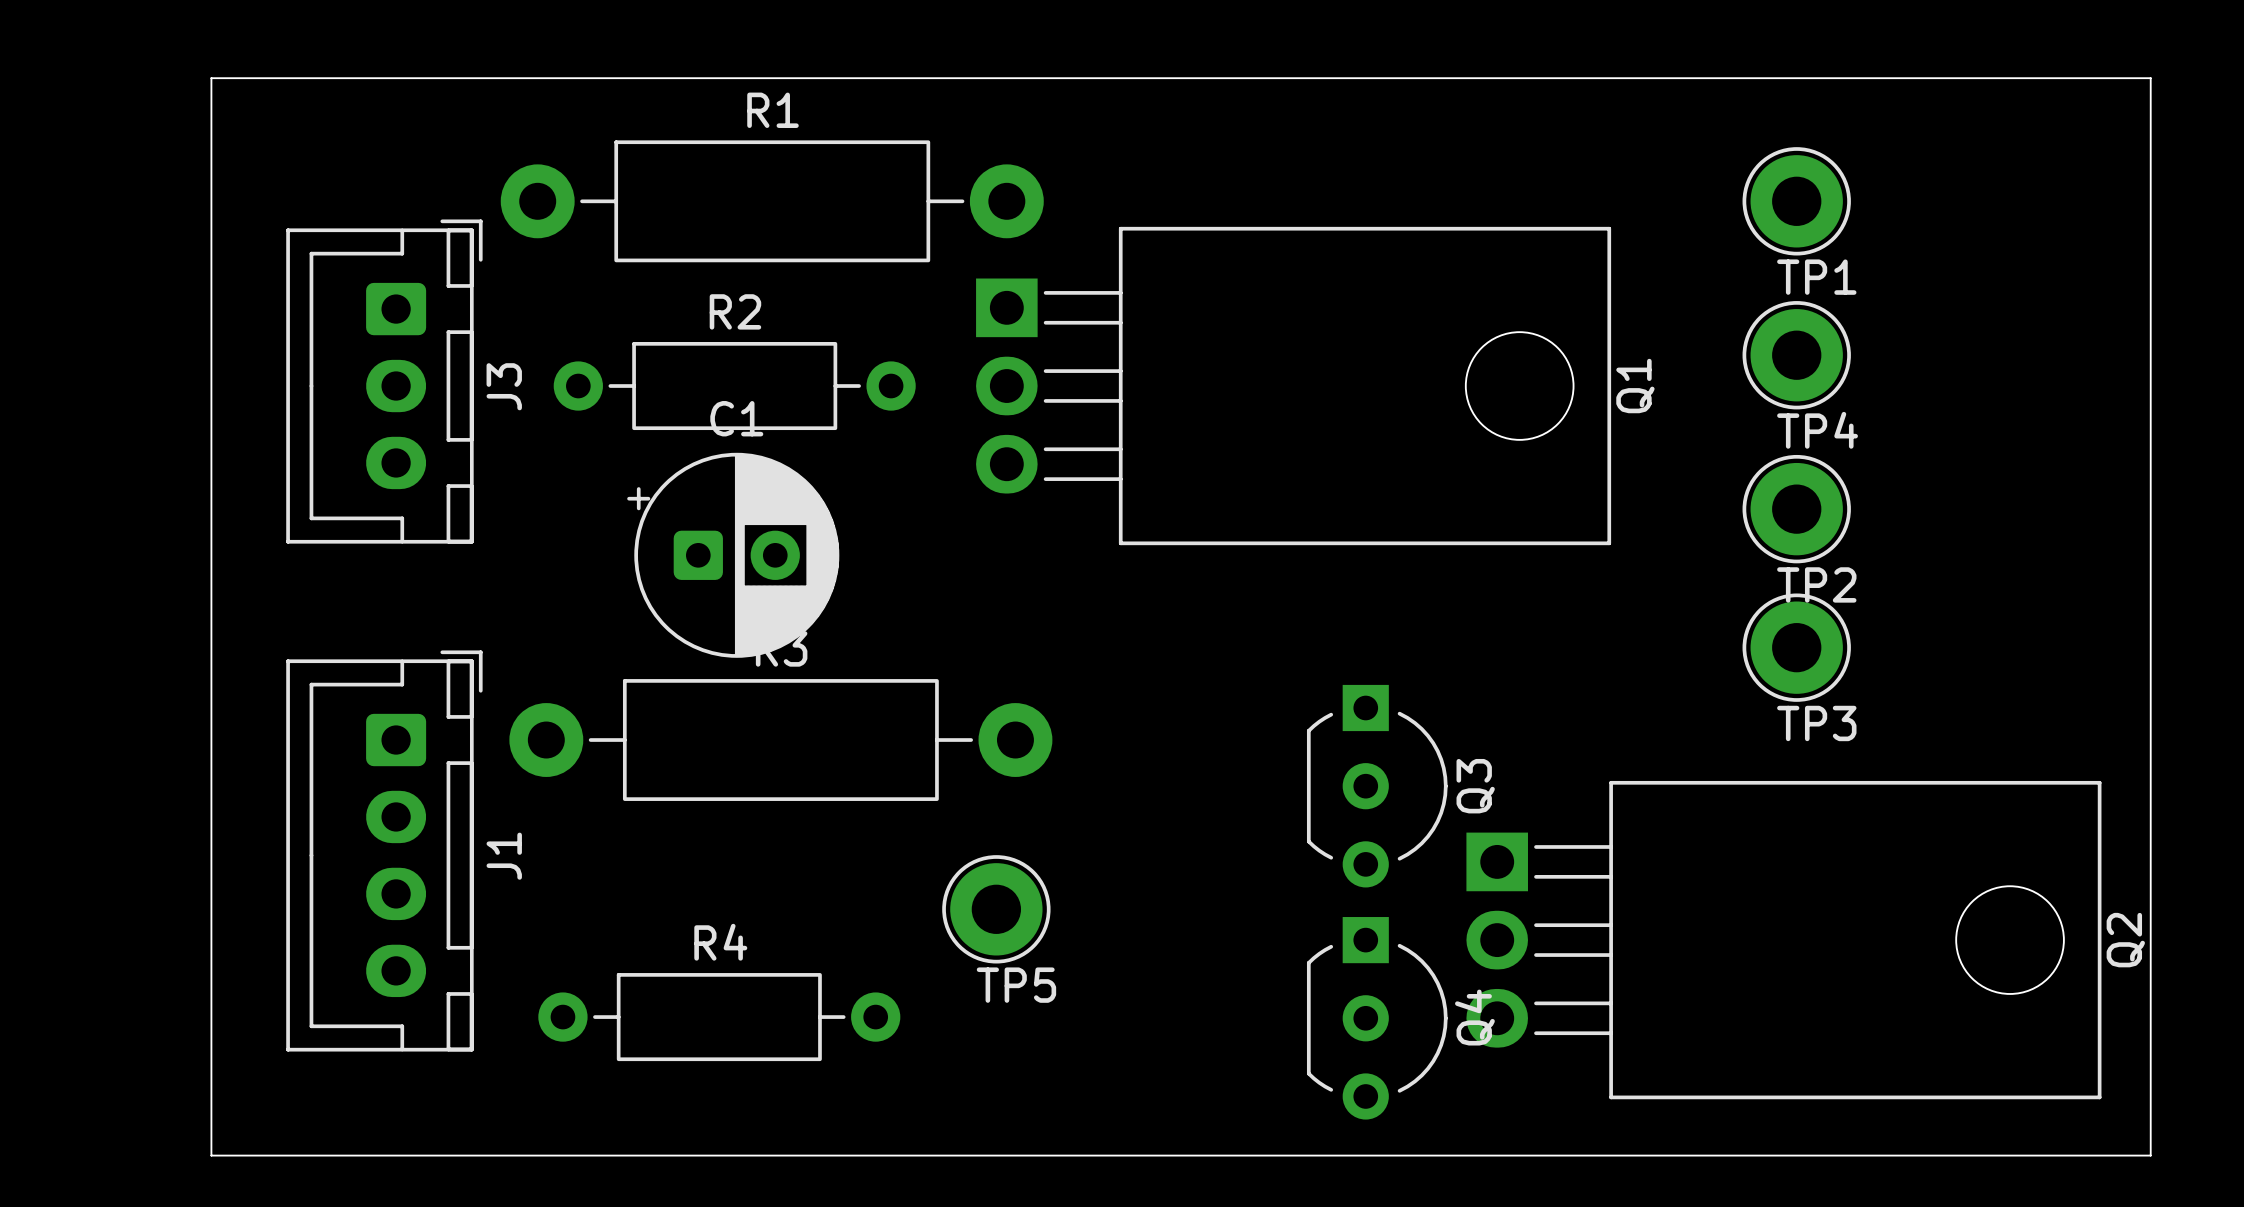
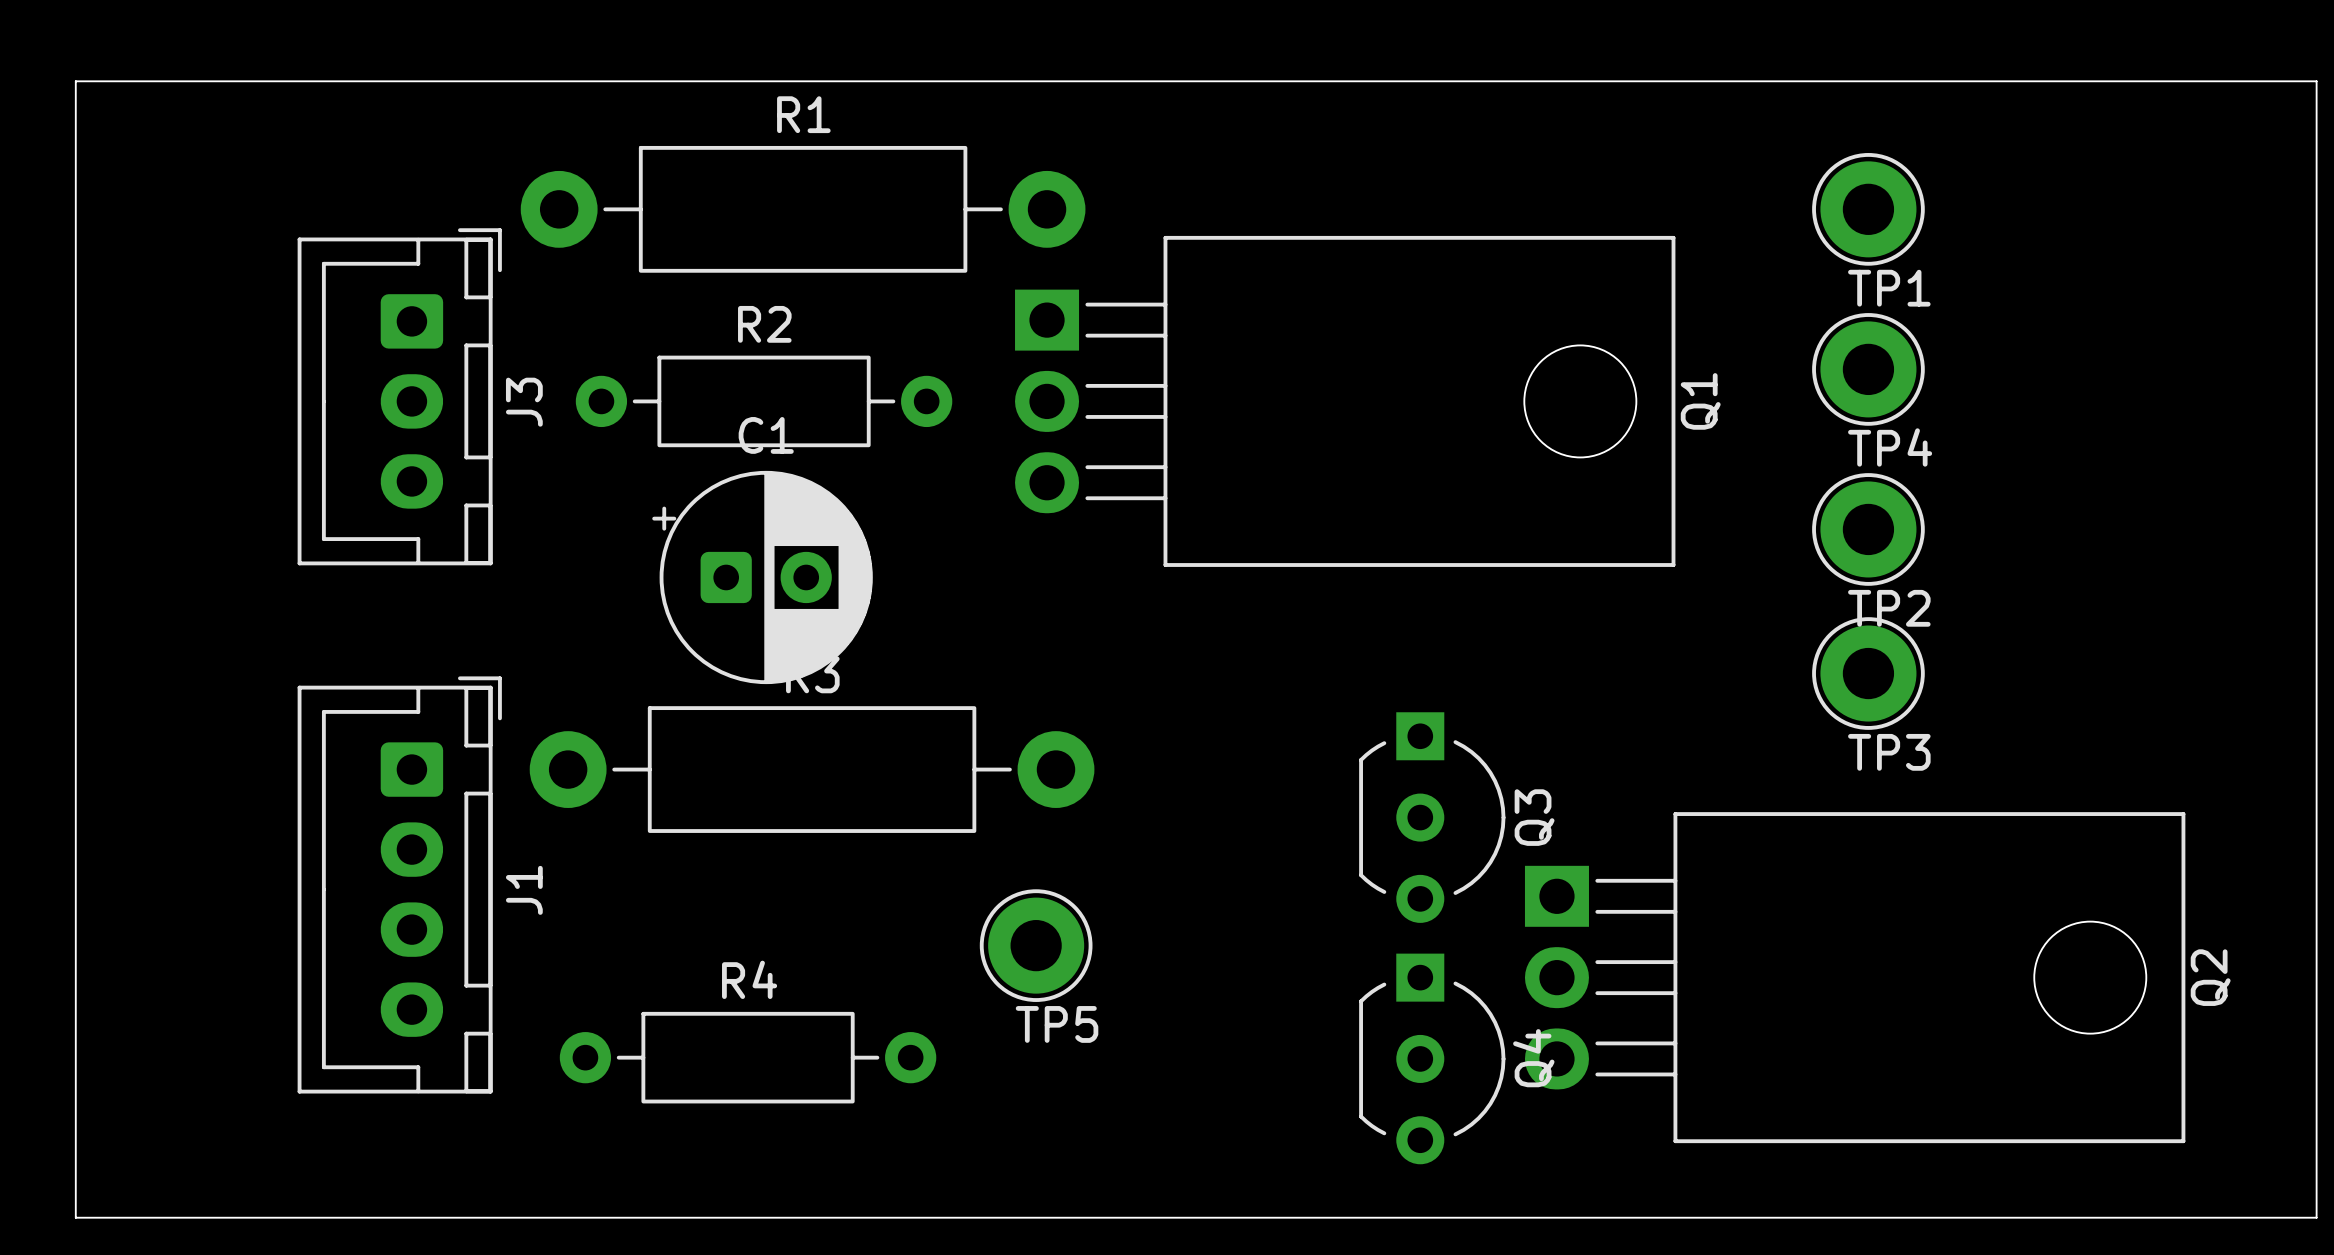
board edge: (211, 78) (211, 1155) (2150, 1155) (2150, 78) -> (219, 81) (75, 81) (75, 1217) (2316, 1217) (2316, 81) (2236, 81)

